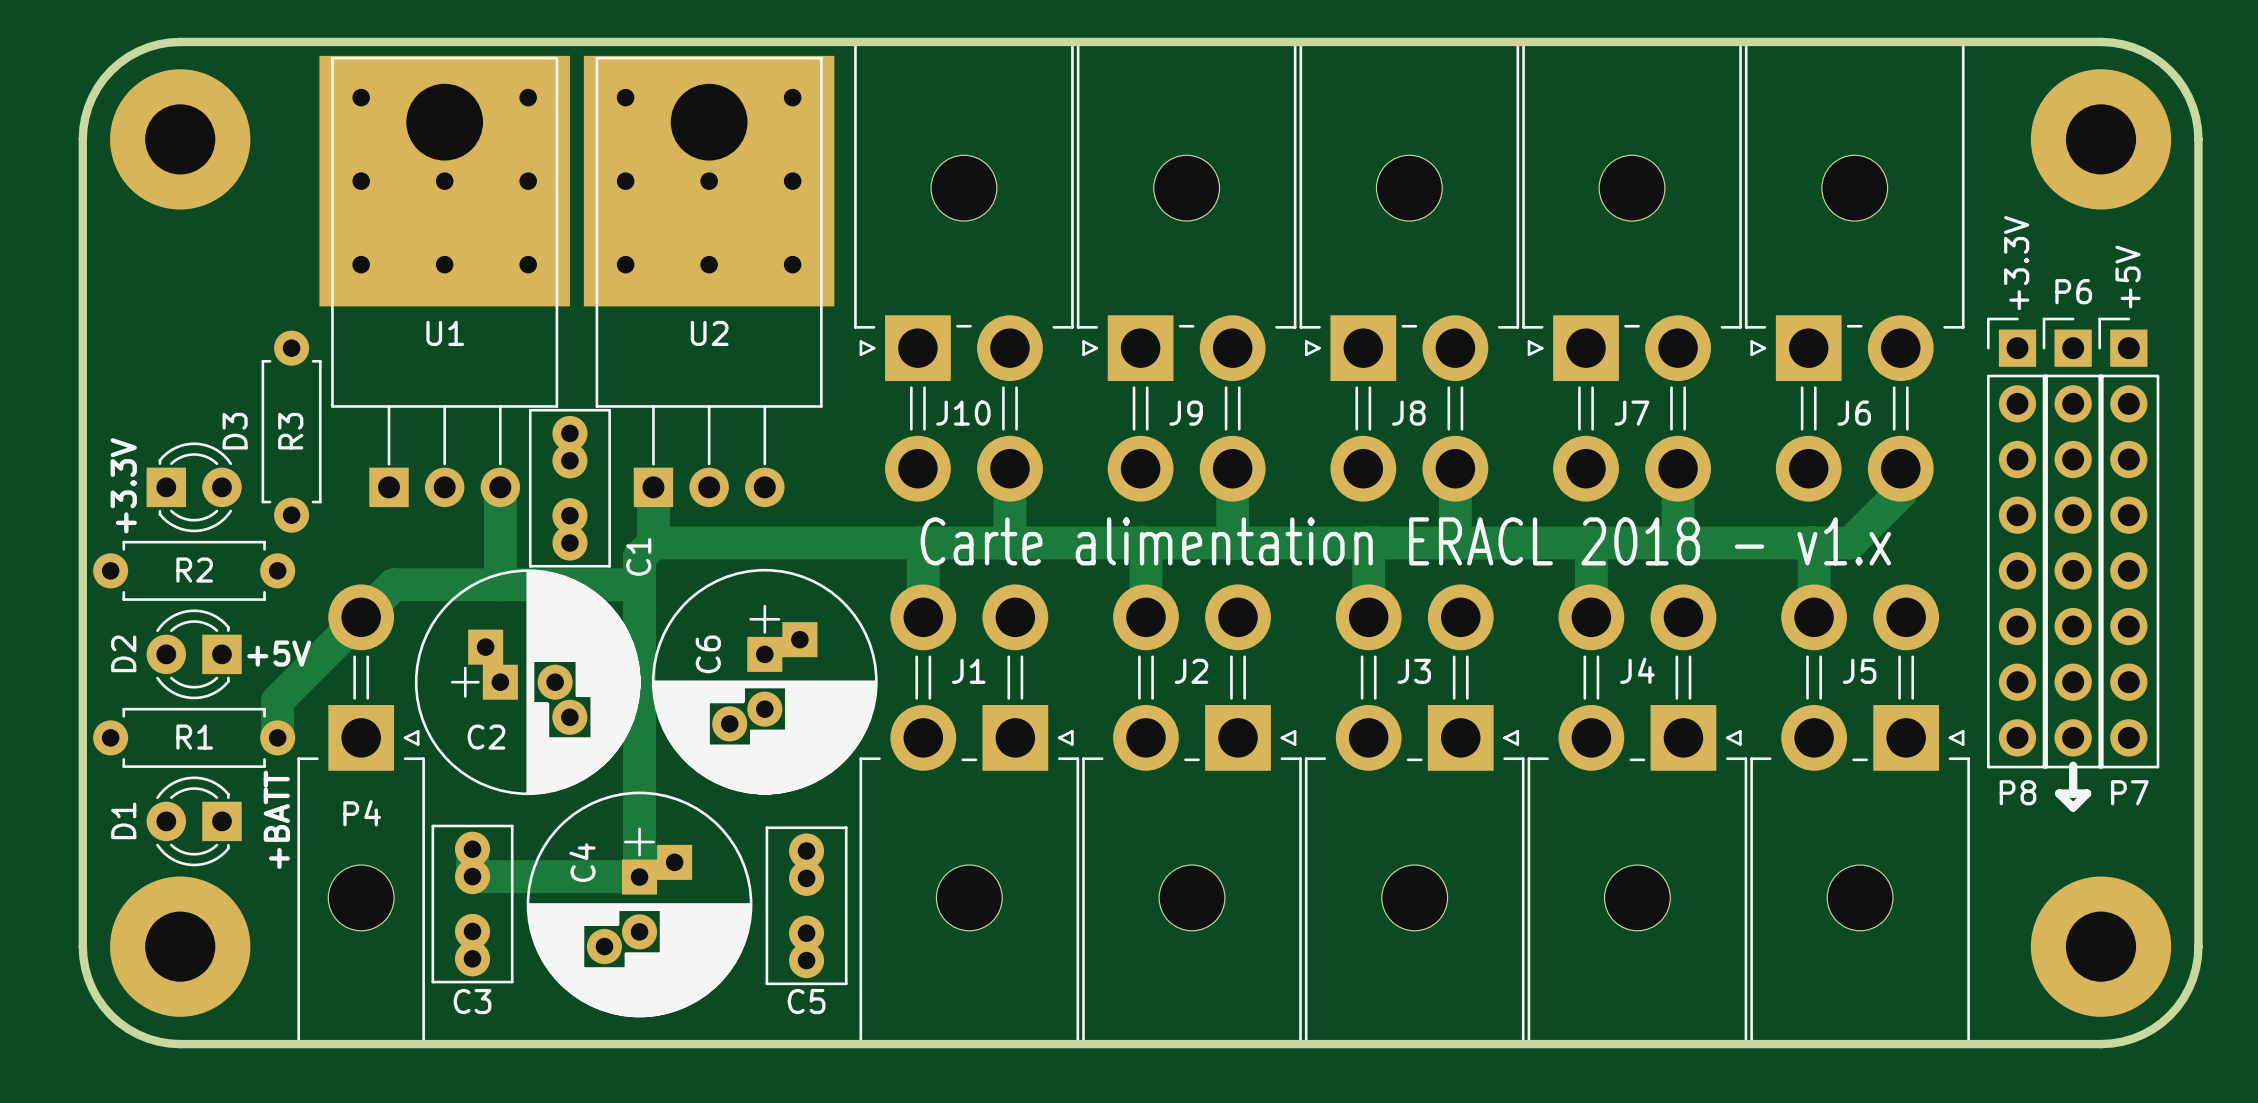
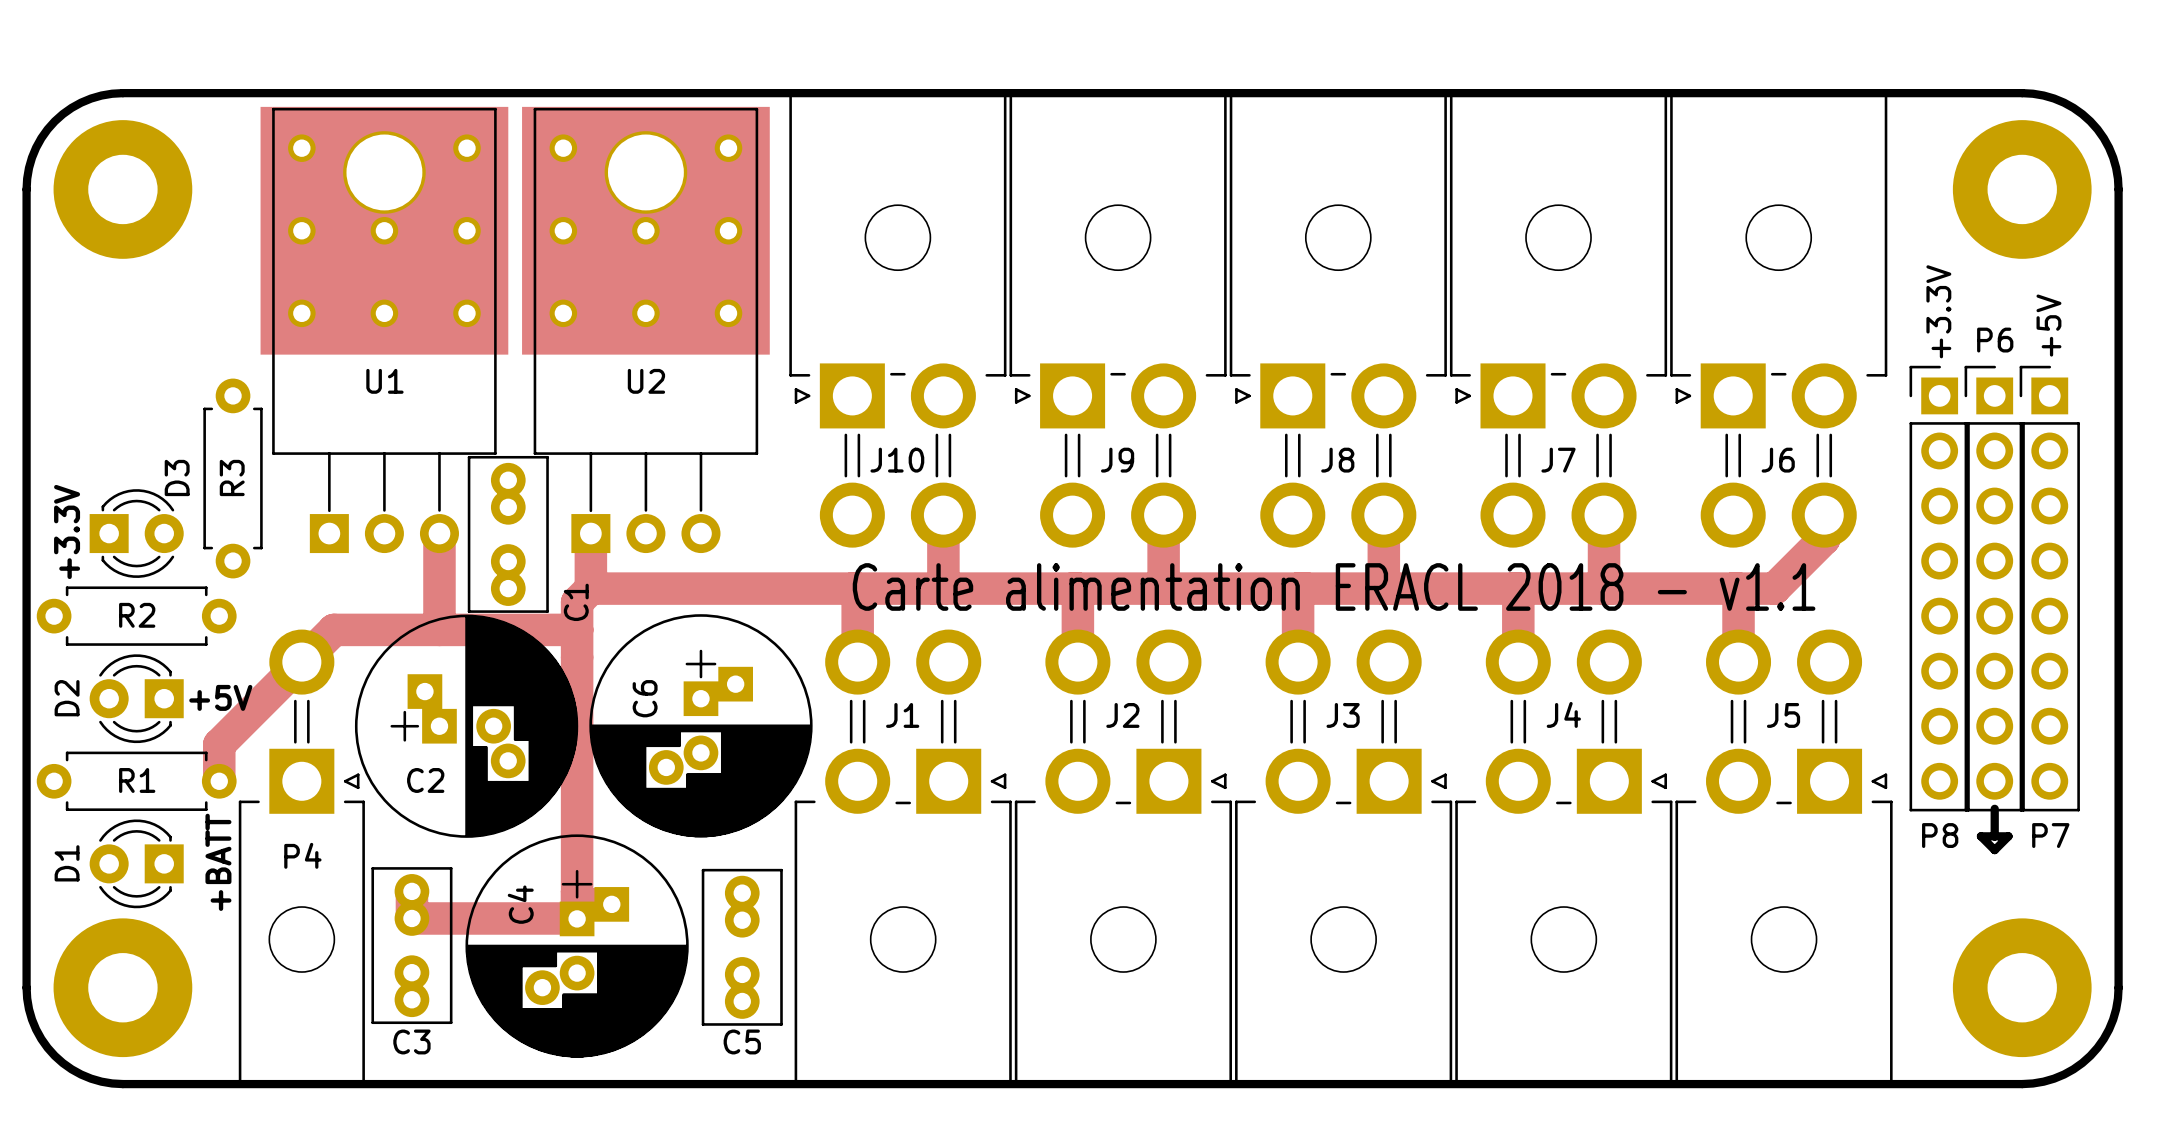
text: Carte alimentation ERACL 2018 - v1.x (1405, 541) -> Carte alimentation ERACL 2018 - v1.1 (1334, 586)

